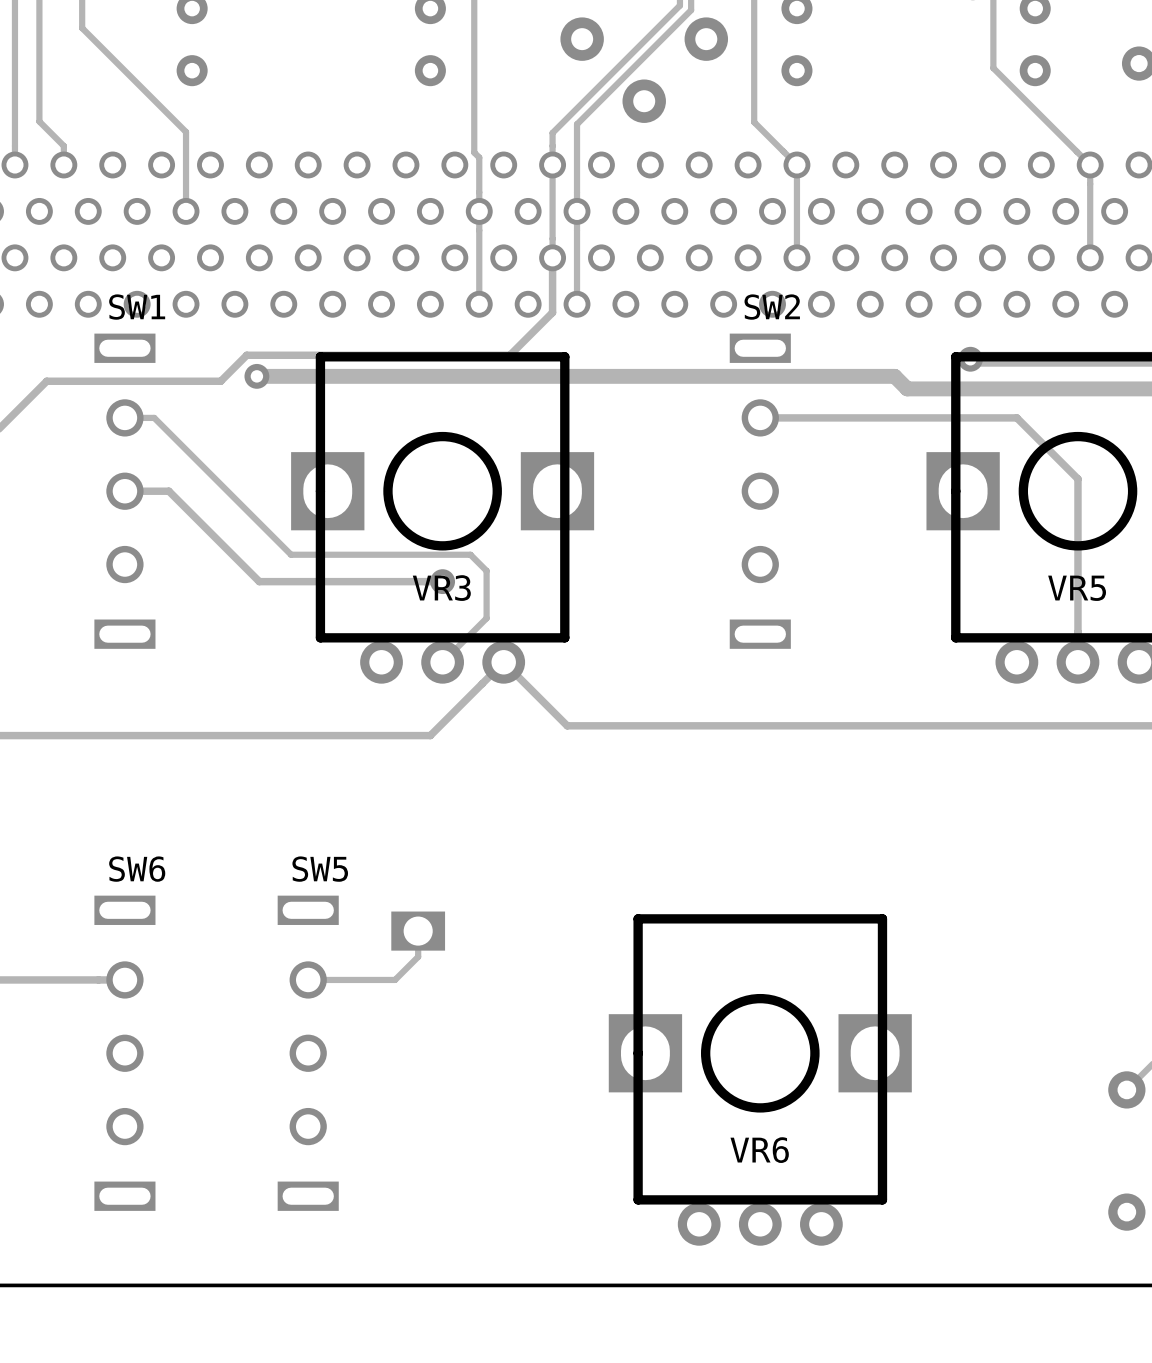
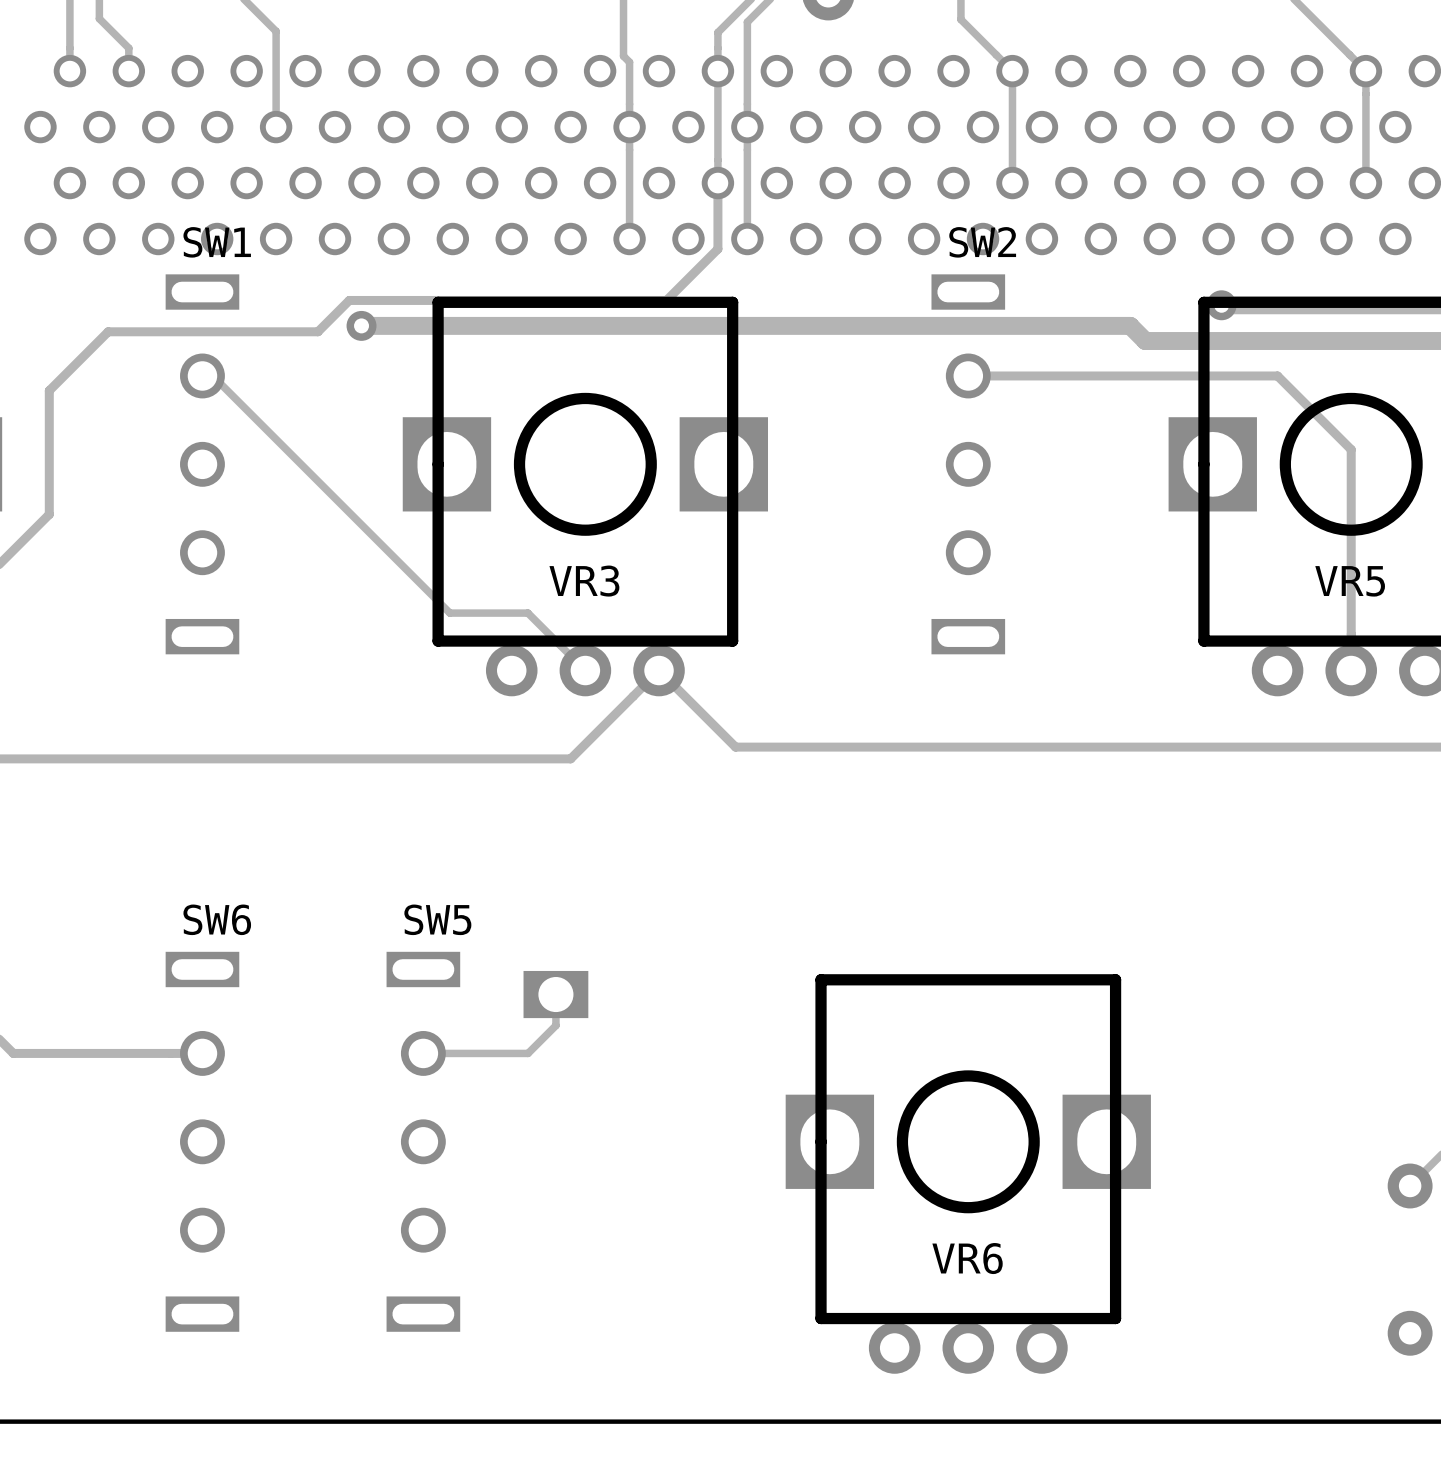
track: (133, 417) (154, 417) (291, 554) (470, 554) (486, 570) (486, 618) (442, 662) -> (212, 375) (449, 613) (527, 613) (585, 670)
track: (124, 491) (168, 491) (259, 581) (442, 581) -> none
via: (442, 581) -> none

